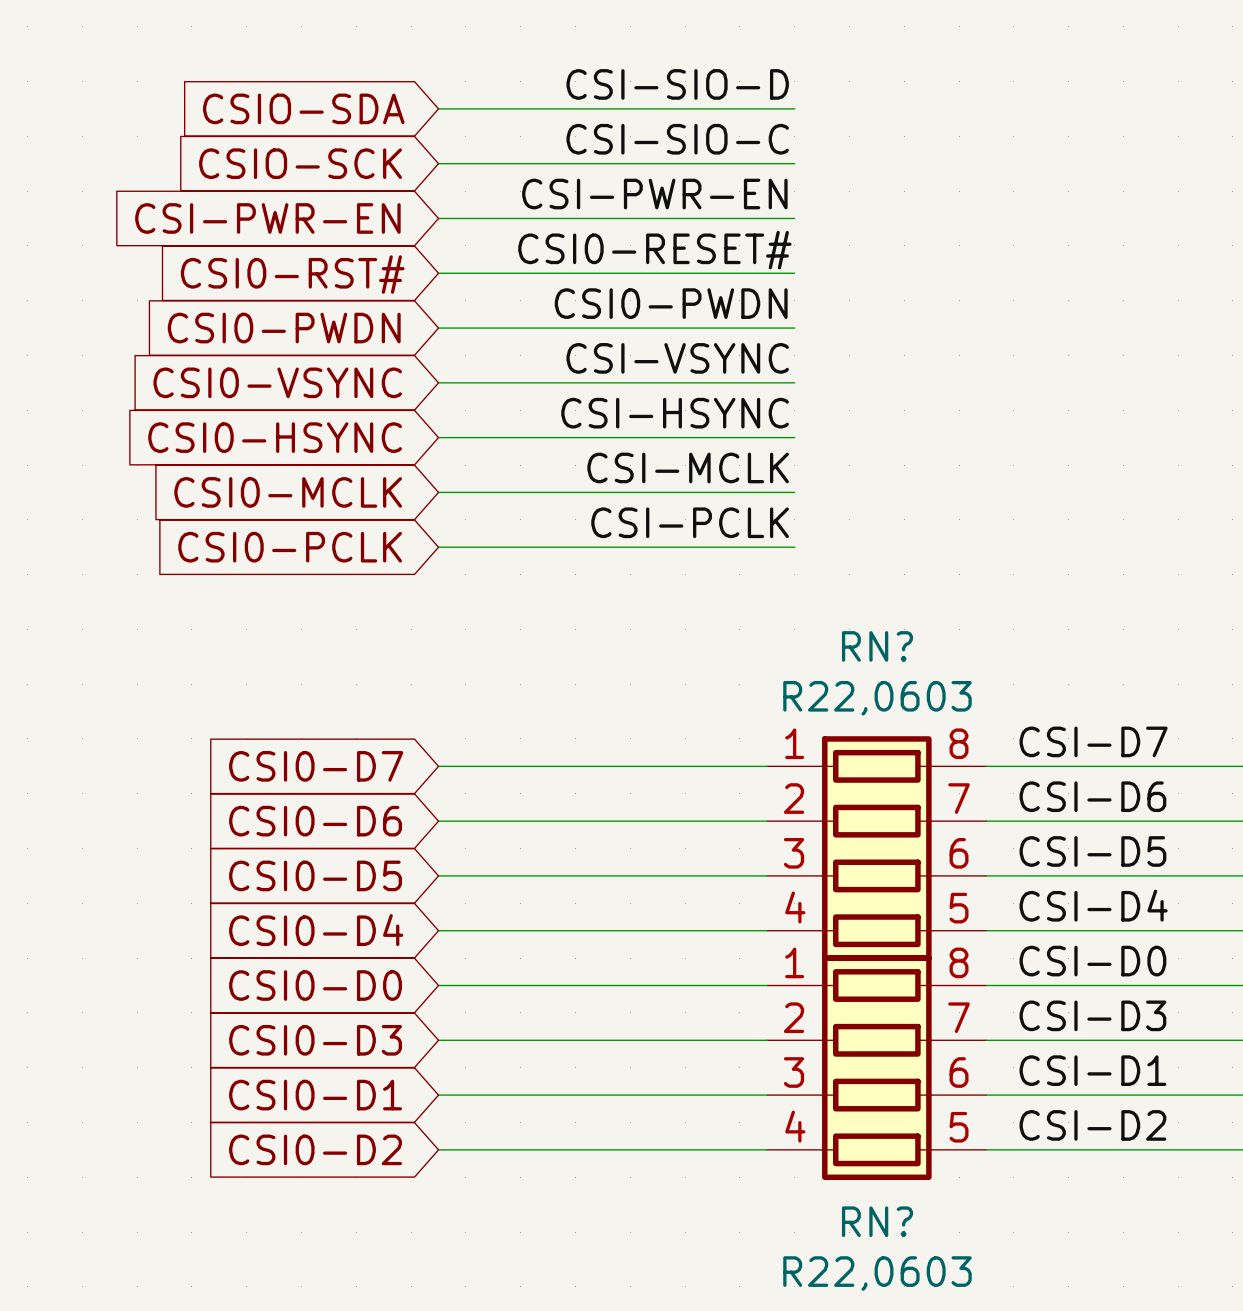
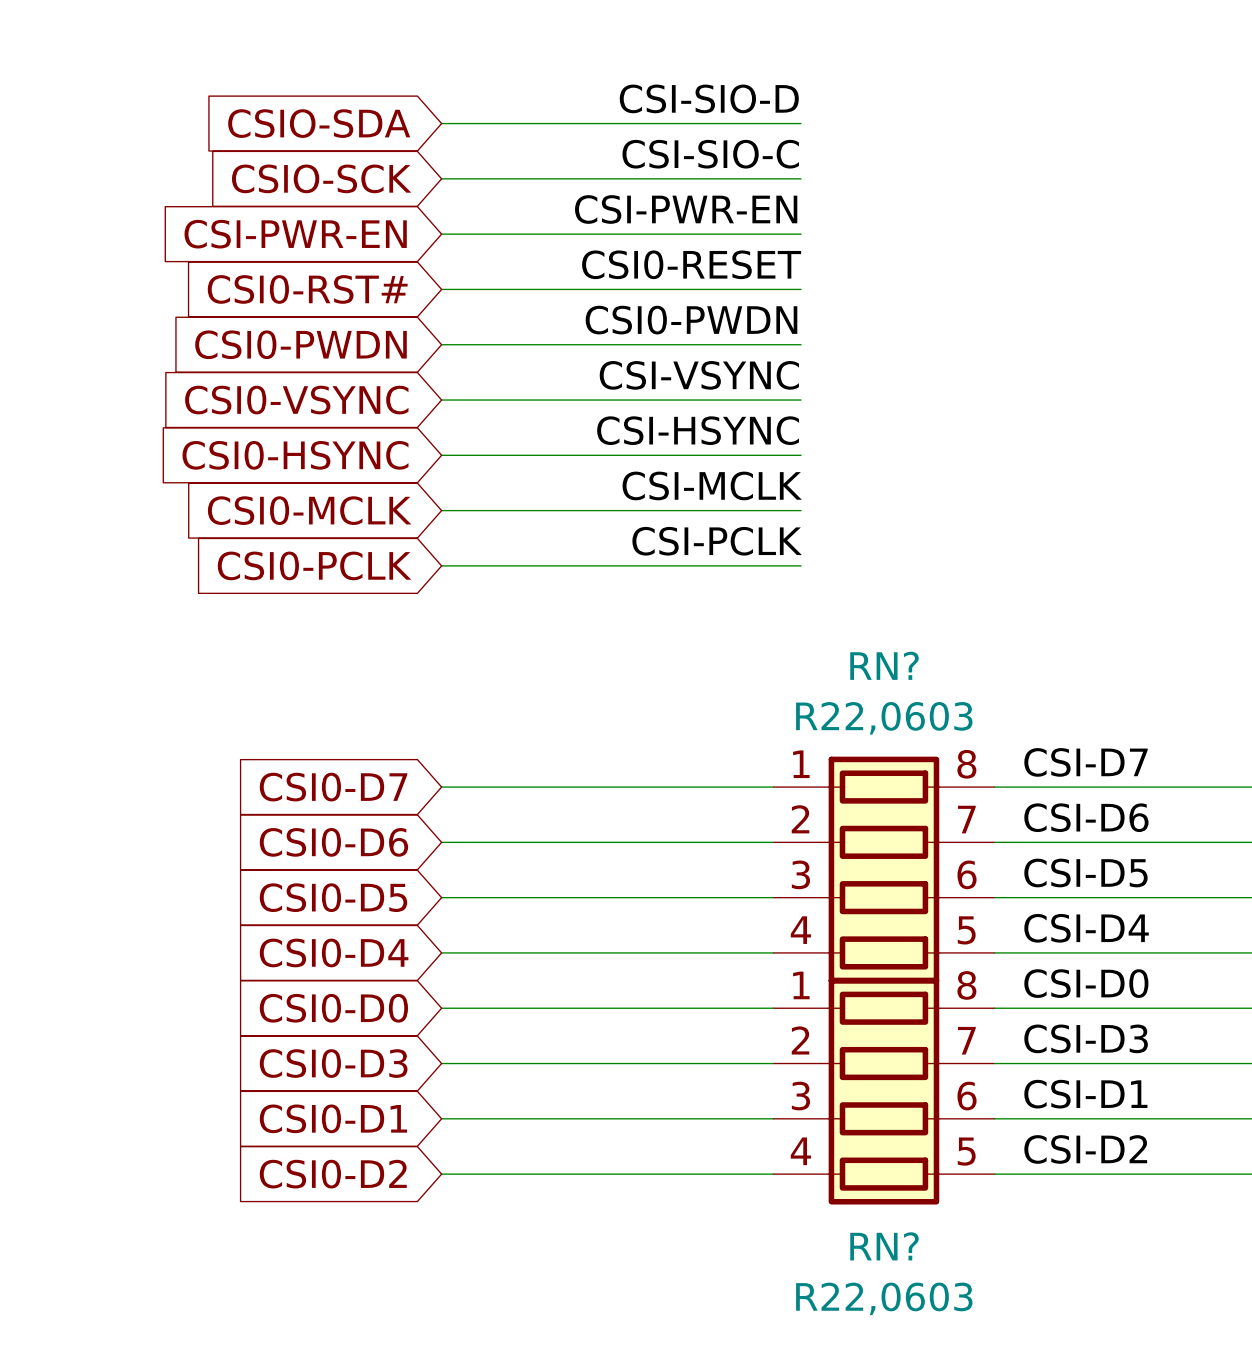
label: CSI0-RESET# (654, 250) -> CSI0-RESET (691, 264)

